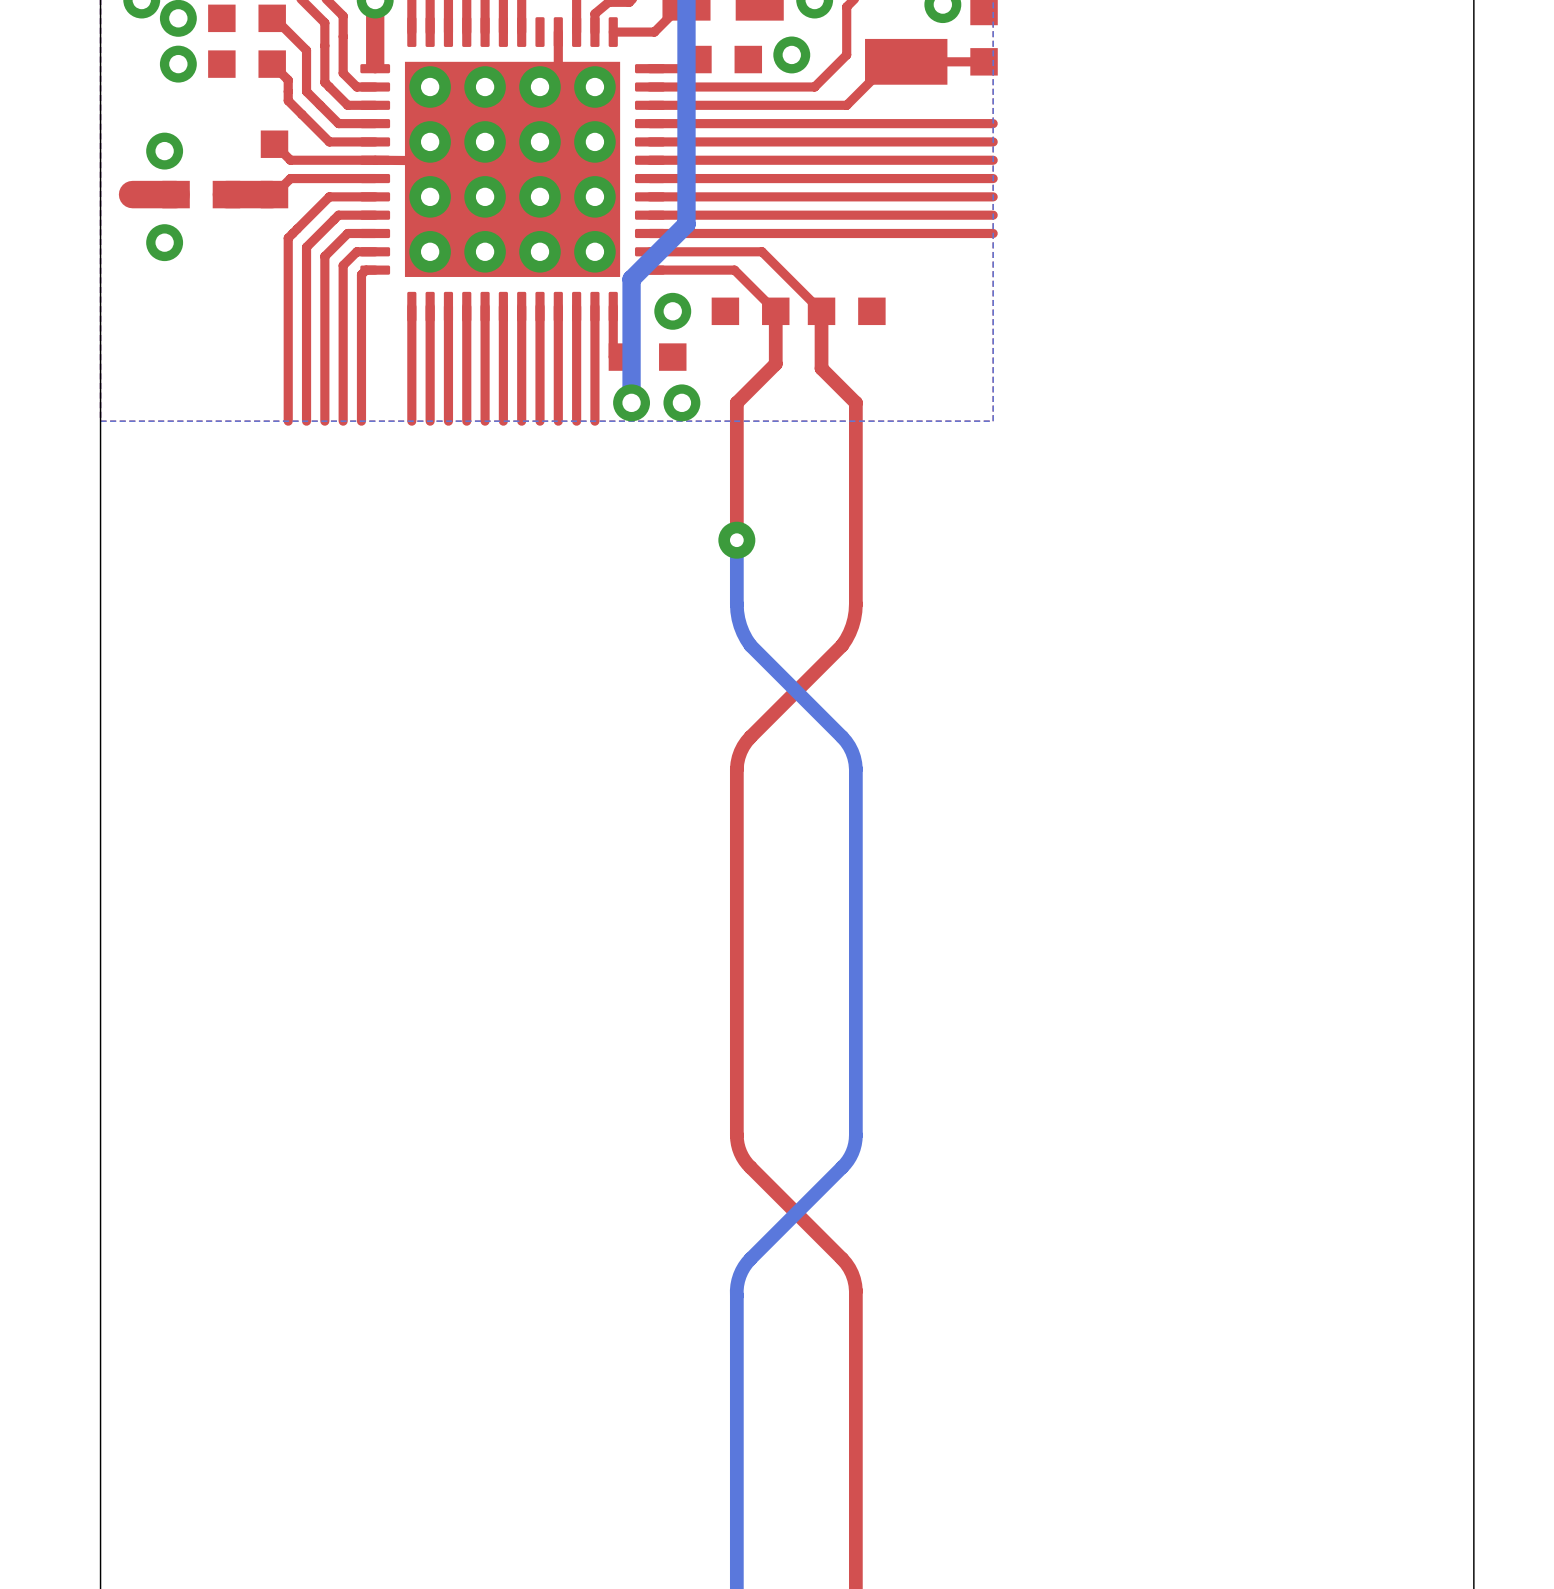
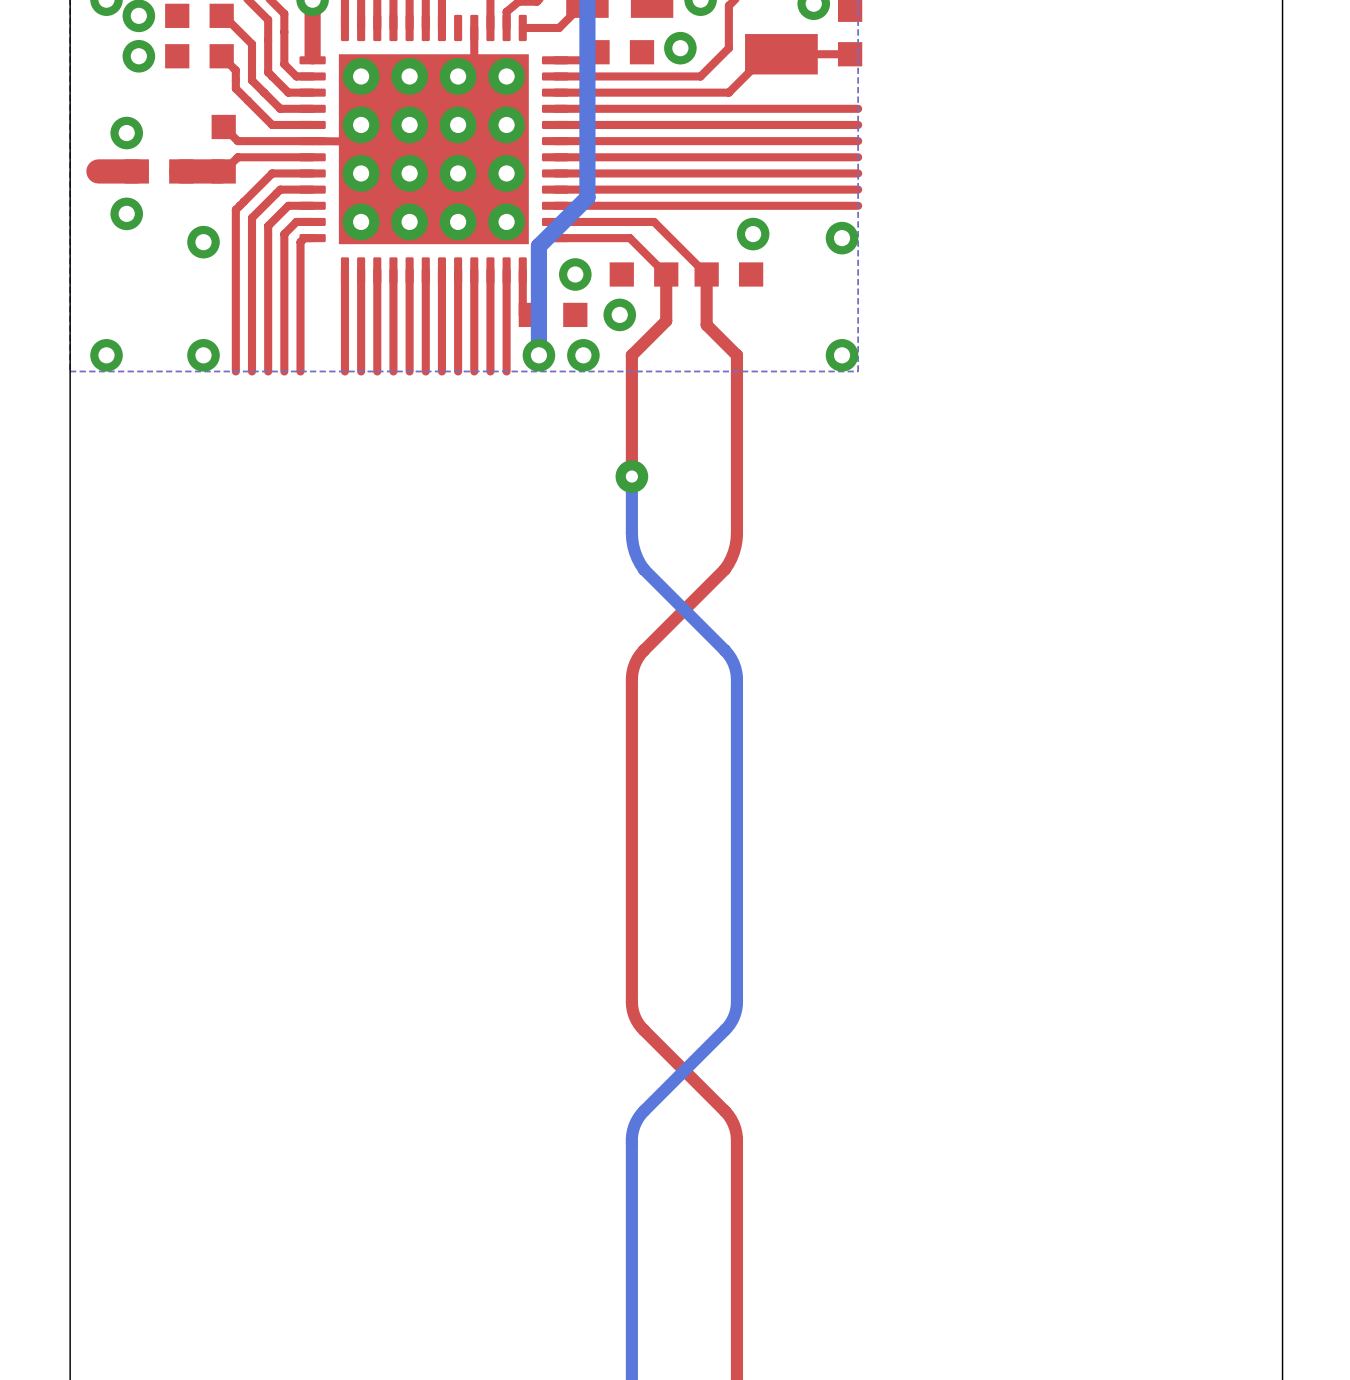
via: none -> (753, 234)
via: none -> (842, 238)
via: none -> (203, 242)
via: none -> (619, 314)
via: none -> (106, 355)
via: none -> (203, 355)
via: none -> (842, 355)

